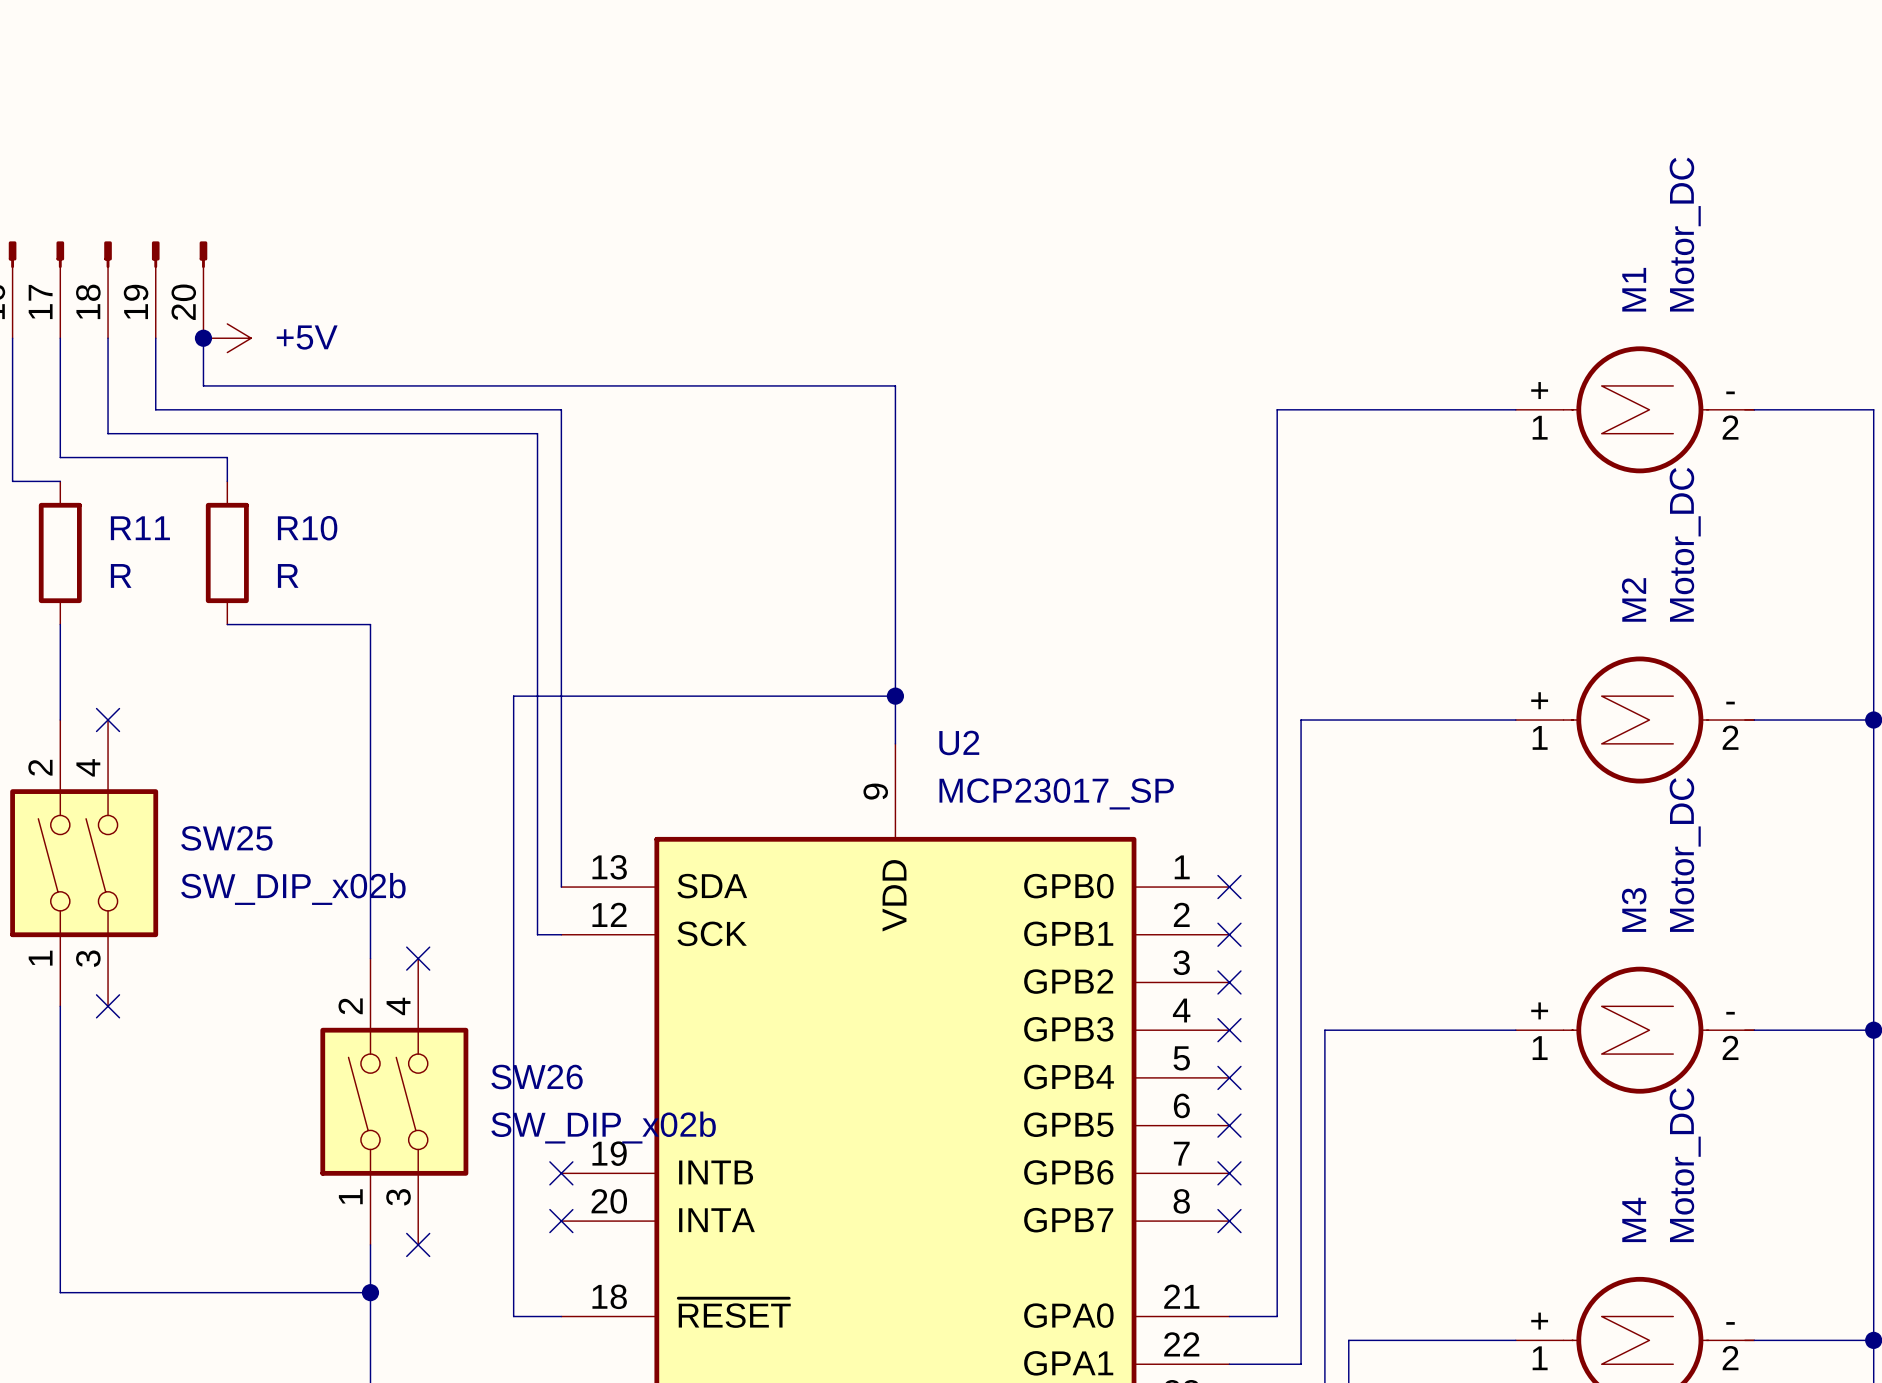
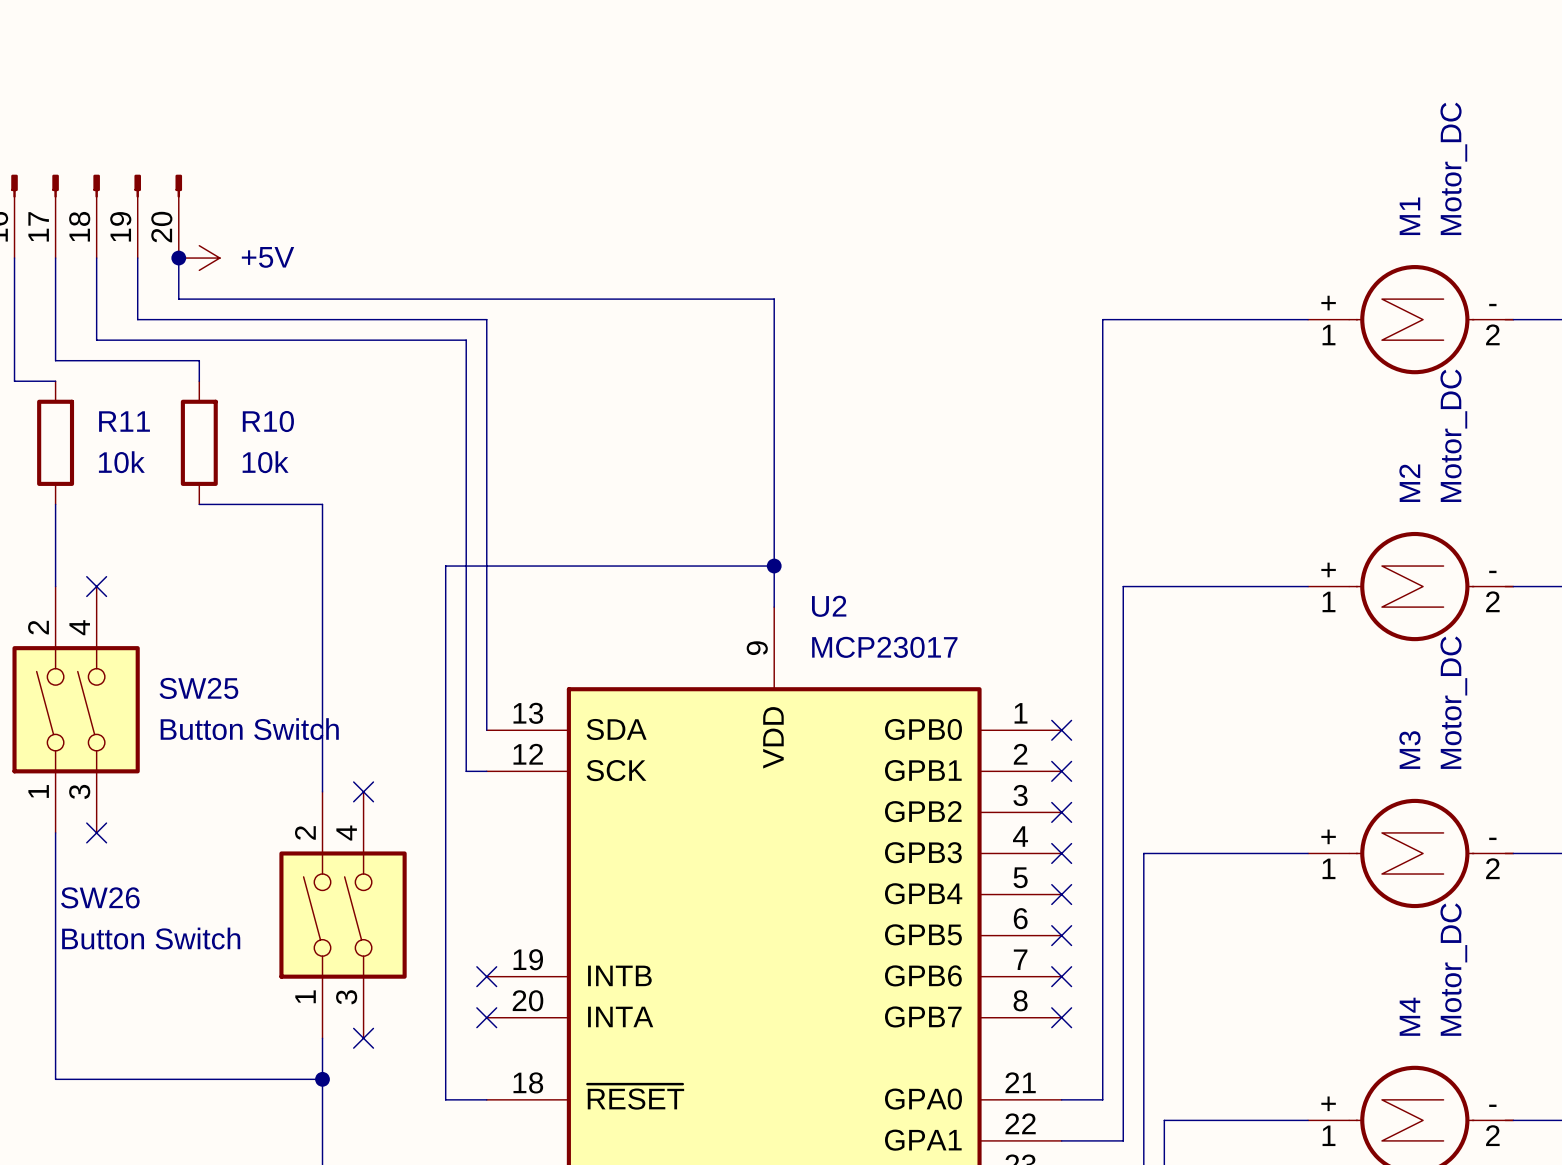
R11 value: R (121, 575) -> 10k (121, 462)
R10 value: R (288, 575) -> 10k (265, 462)
U2 value: MCP23017_SP (1056, 793) -> MCP23017 (884, 647)
SW25 value: SW_DIP_x02b (293, 888) -> Button Switch (249, 729)
SW26 name position: SW26 (537, 1077) -> SW26 (100, 897)
SW26 value: SW_DIP_x02b (603, 1127) -> Button Switch (151, 938)

